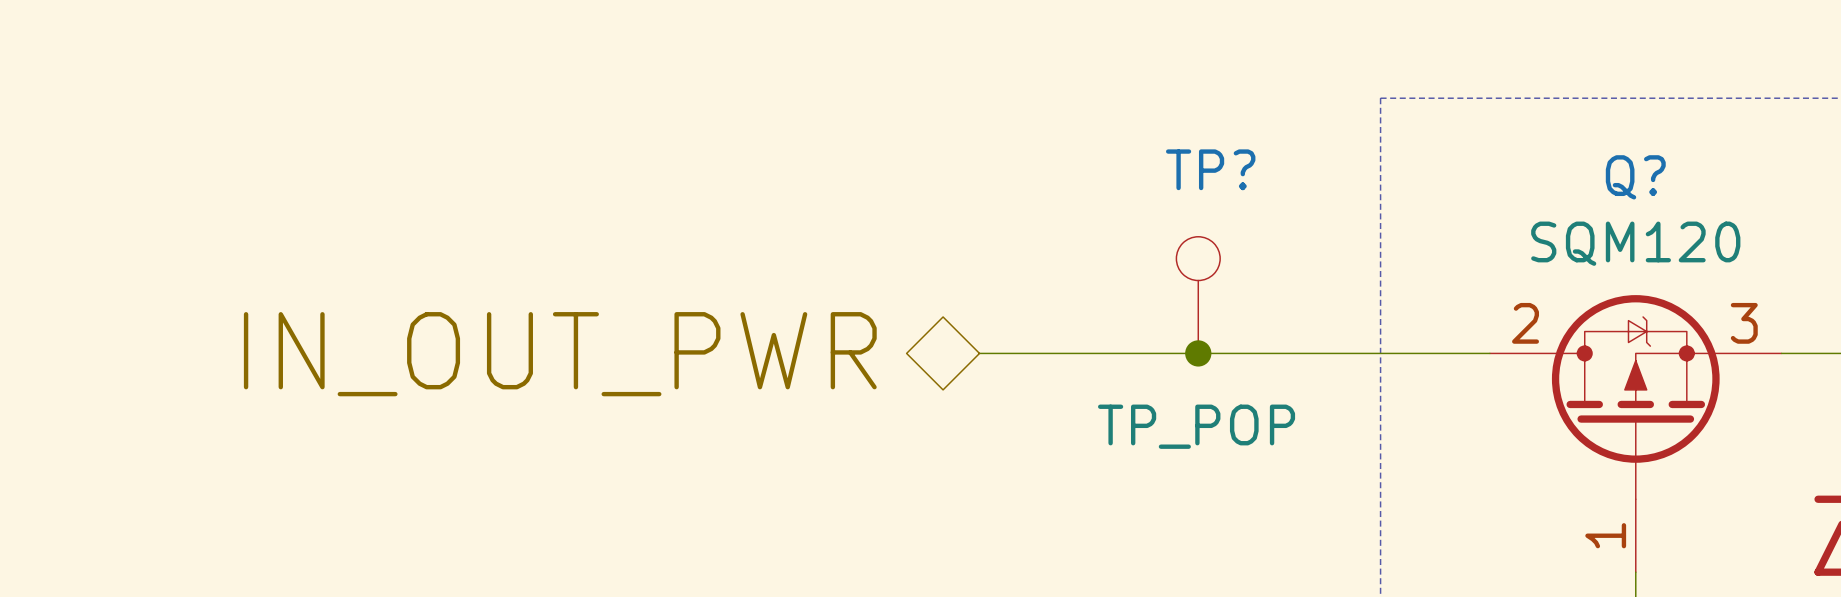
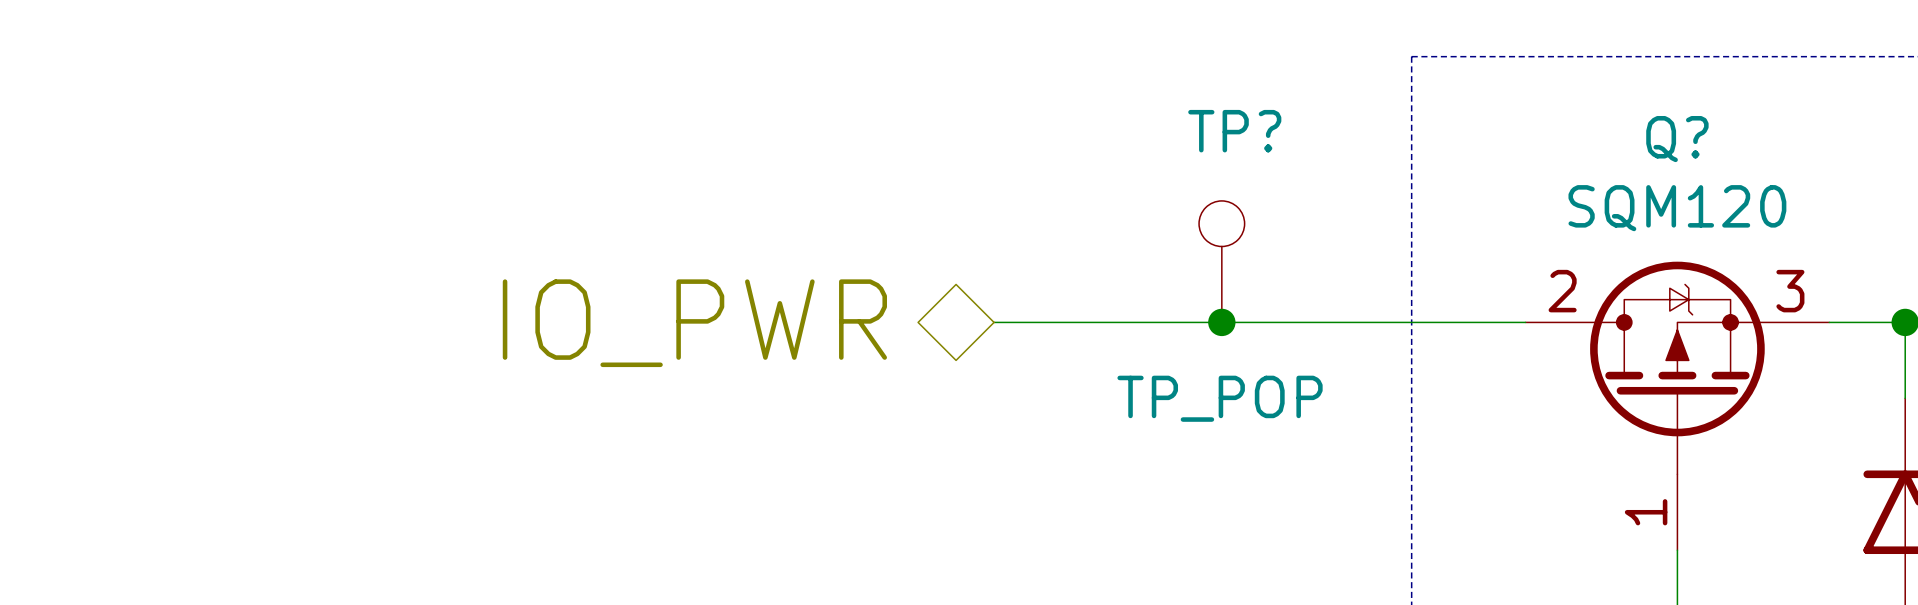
hierarchical label: IN_OUT_PWR (560, 354) -> IO_PWR (694, 323)

